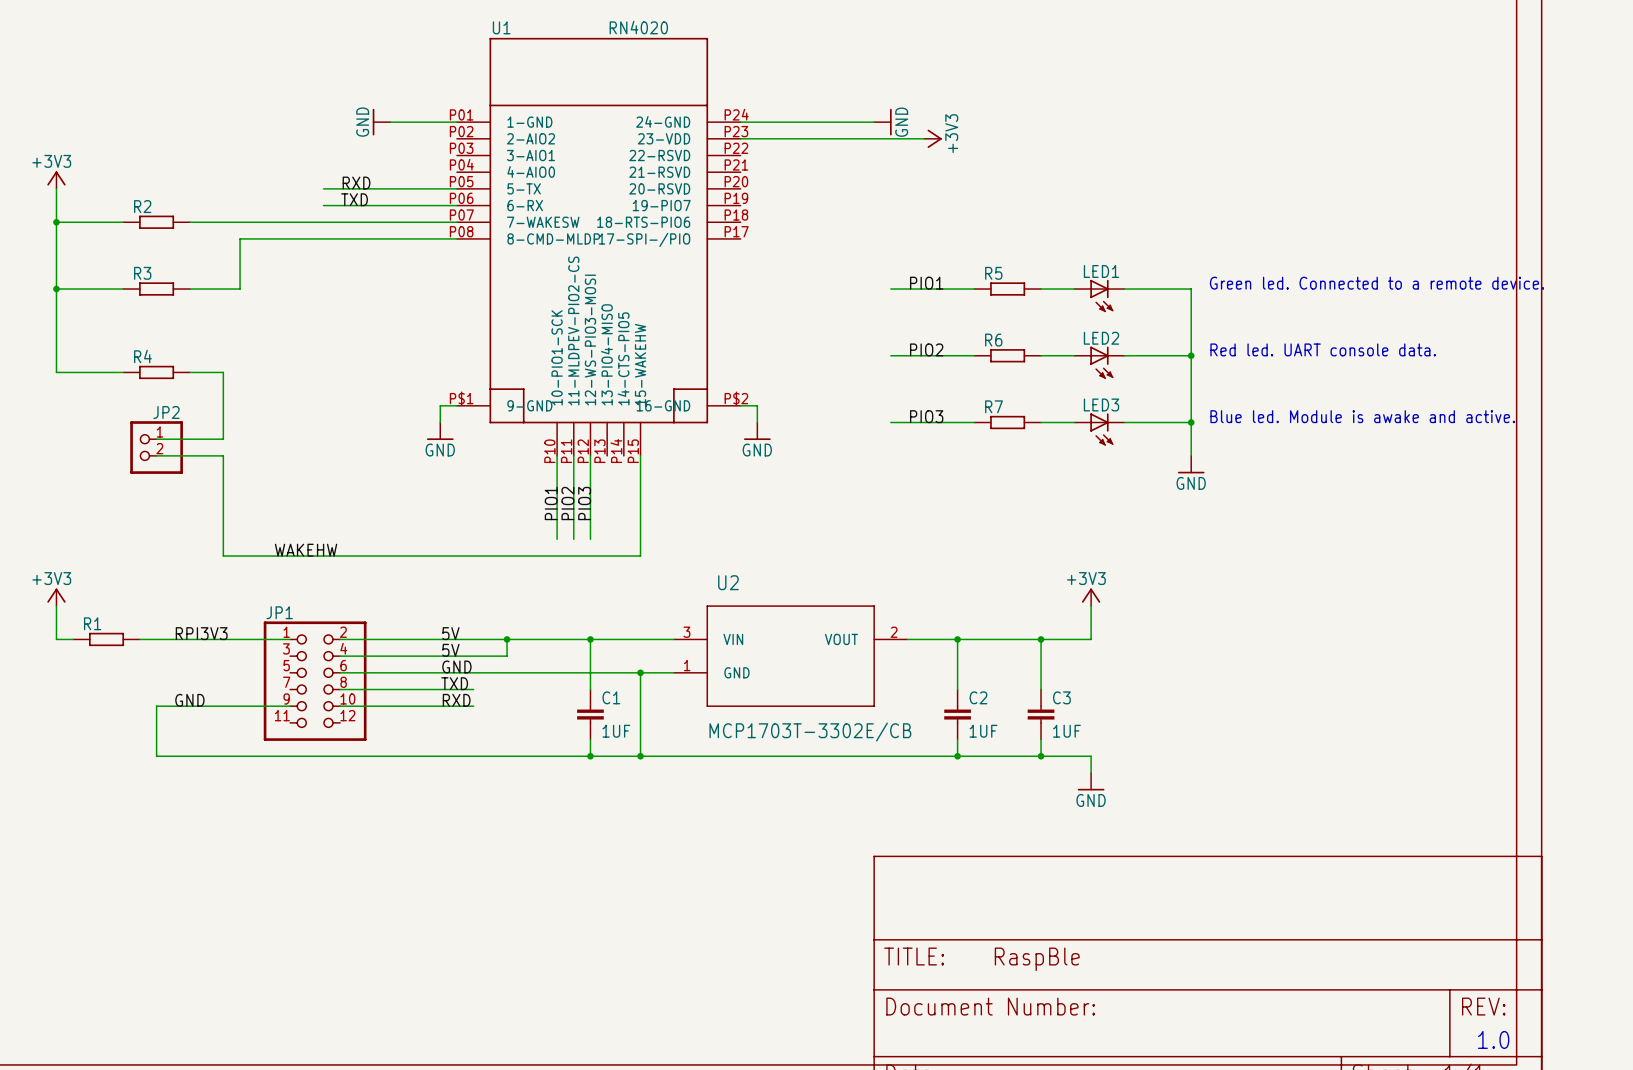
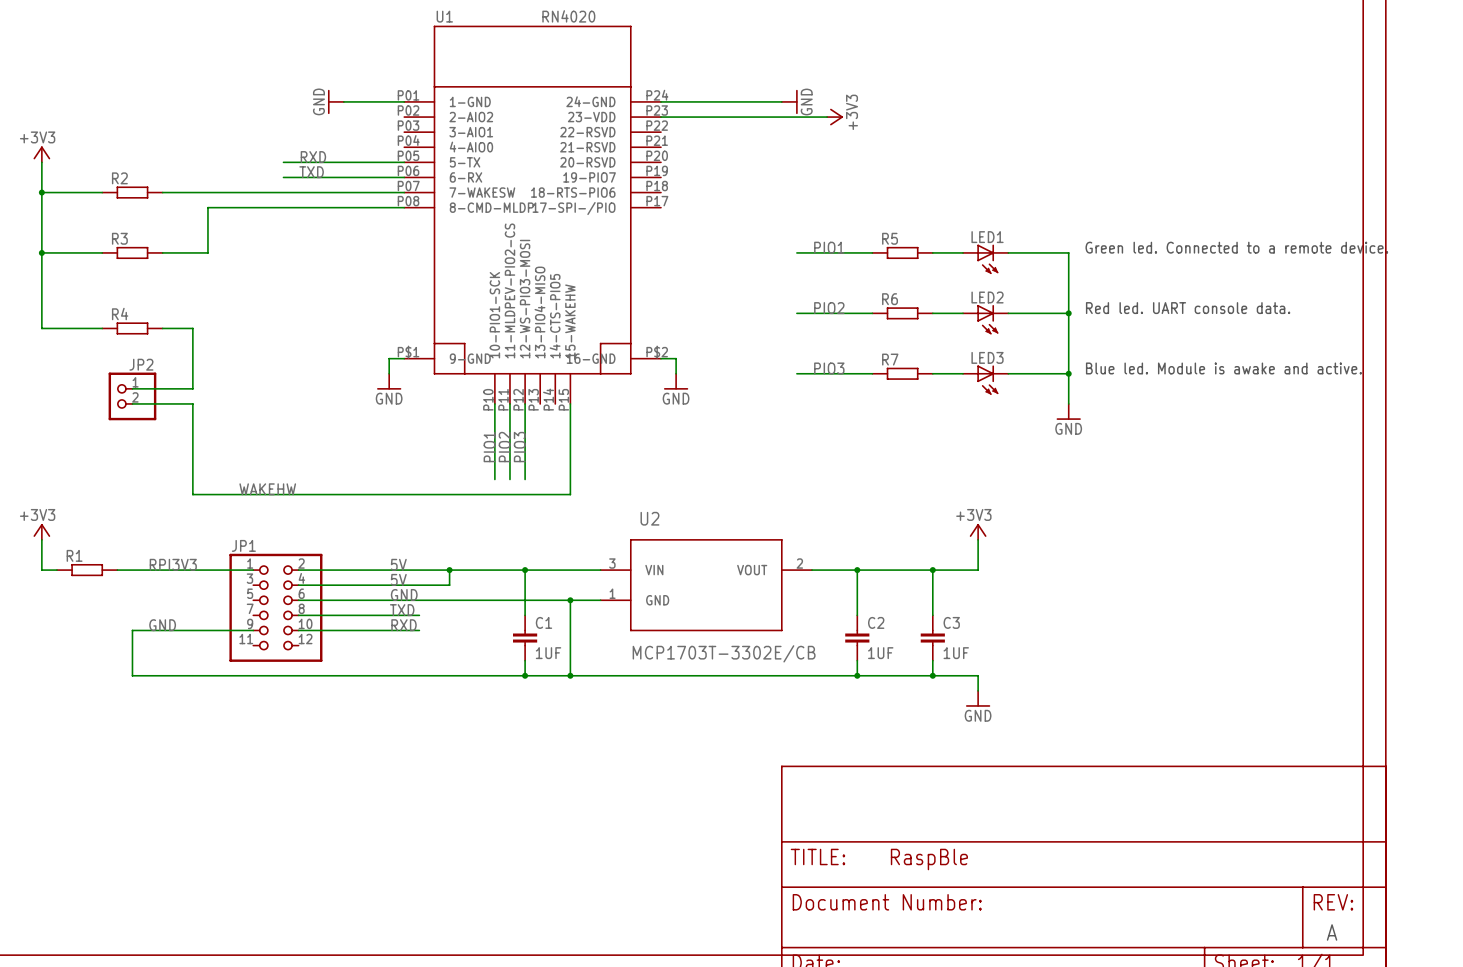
text: 1.0 (1493, 1039) -> A (1332, 932)

